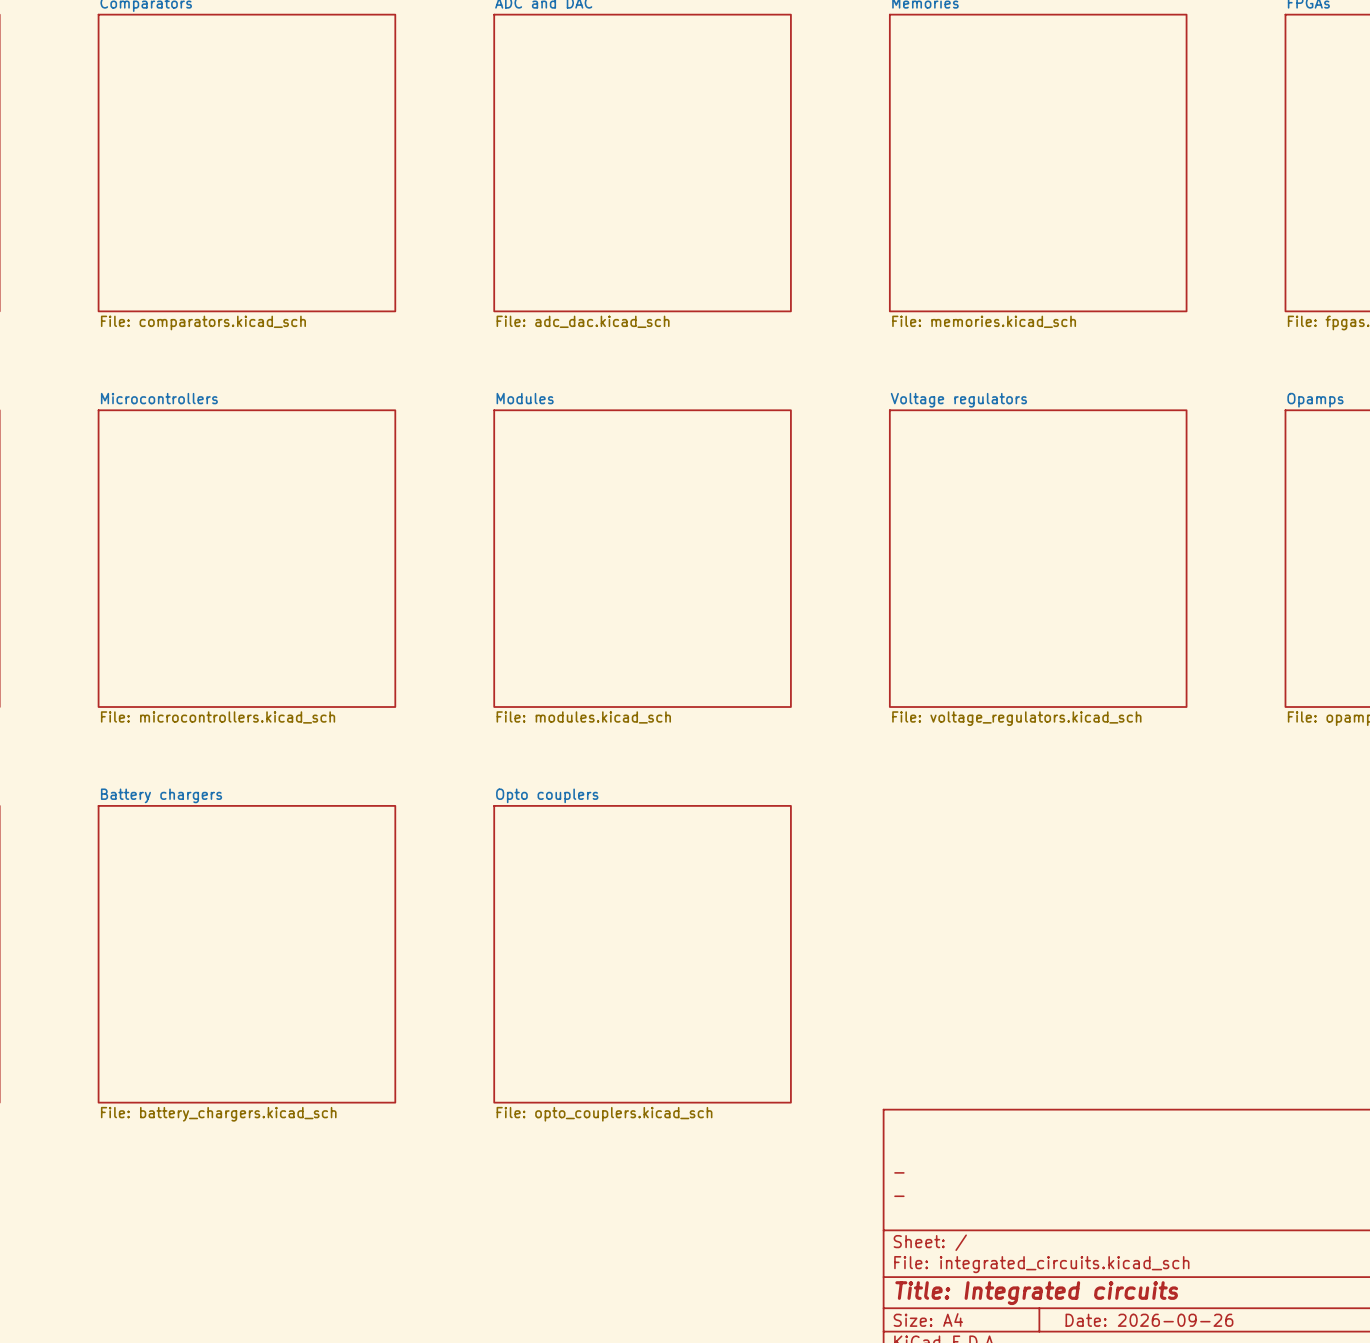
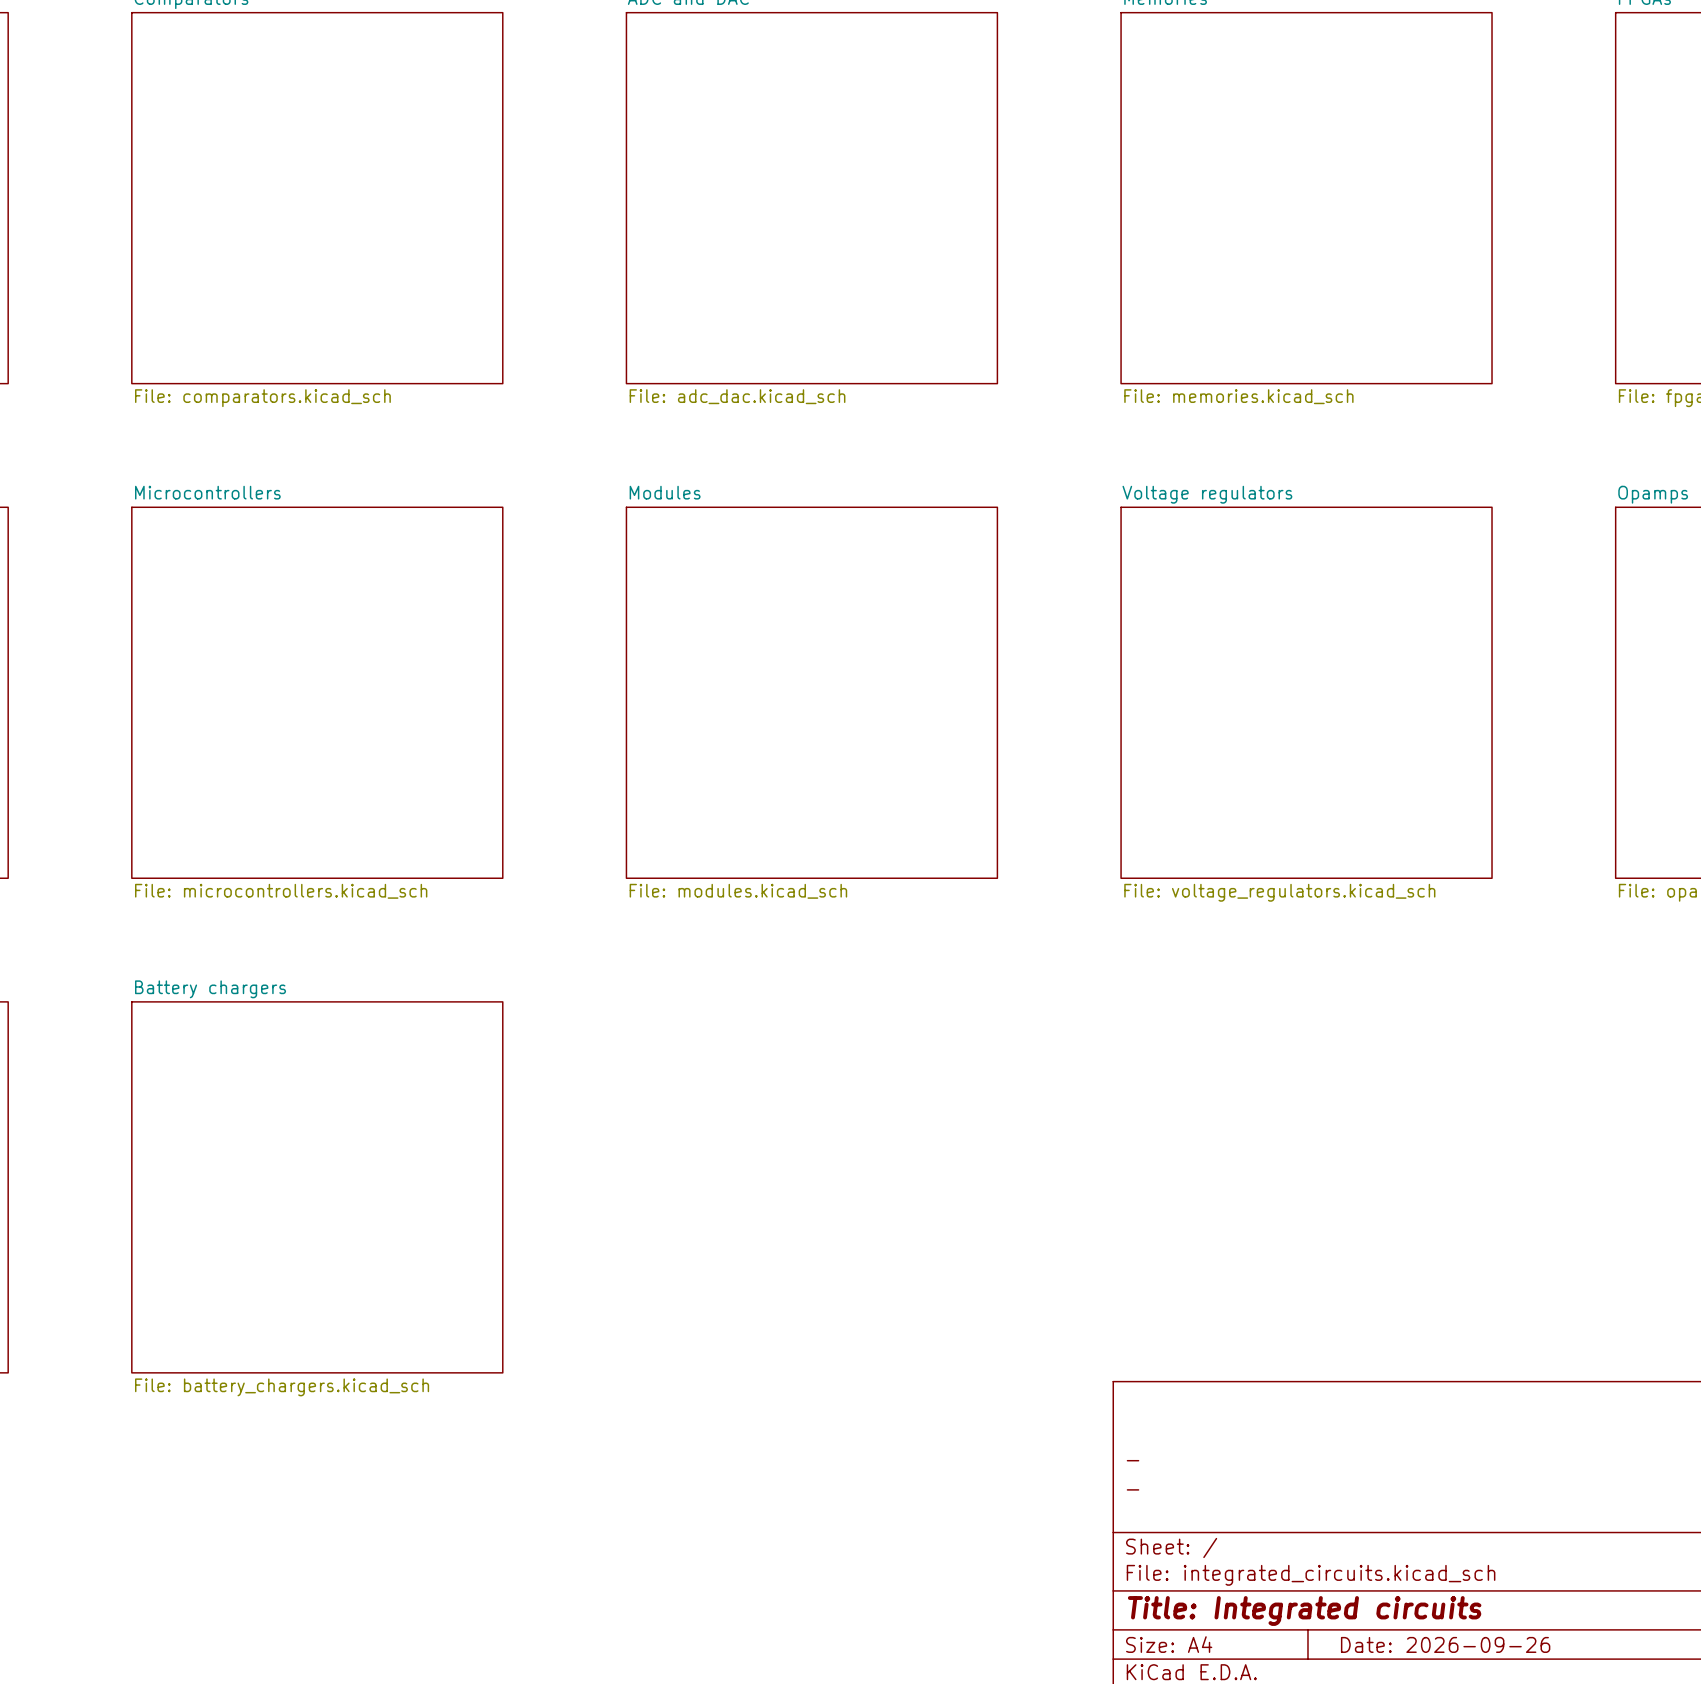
sheet Opto couplers: File: opto_couplers.kicad_sch (642, 954) -> none

